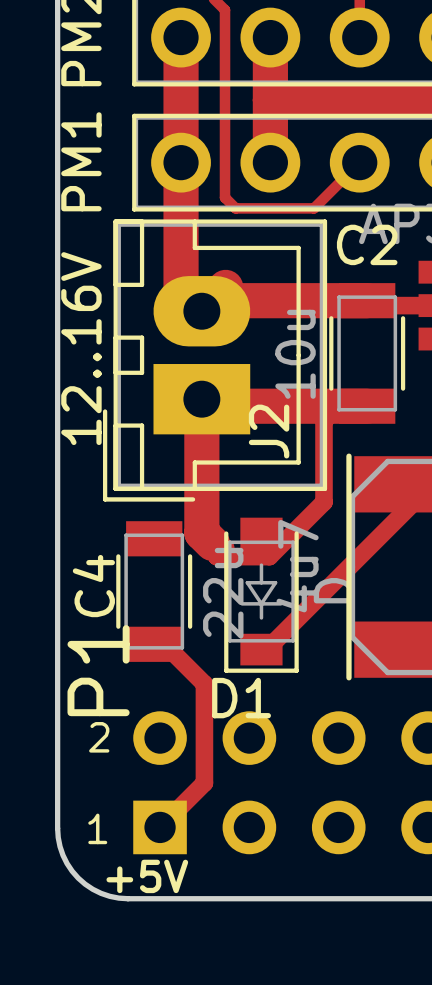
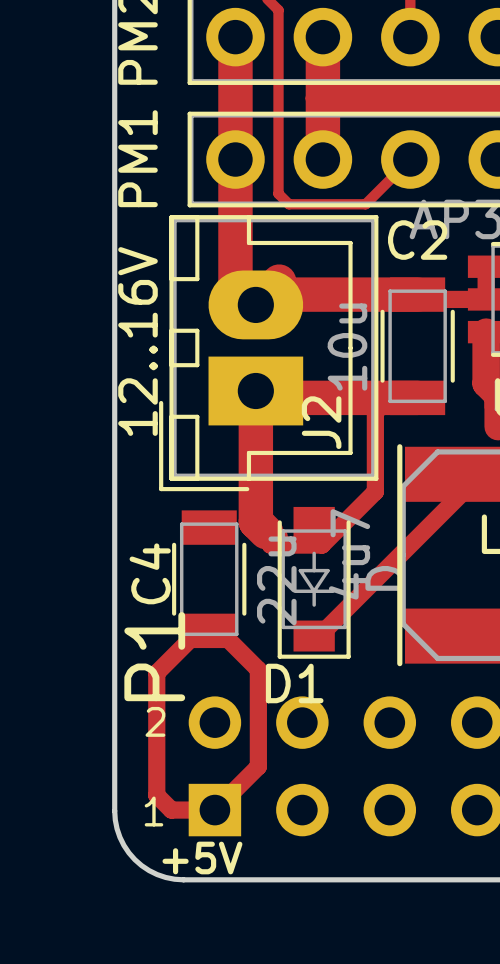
track: none -> (209, 630) (198, 630) (156, 673) (156, 795) (171, 810) (214, 810)

